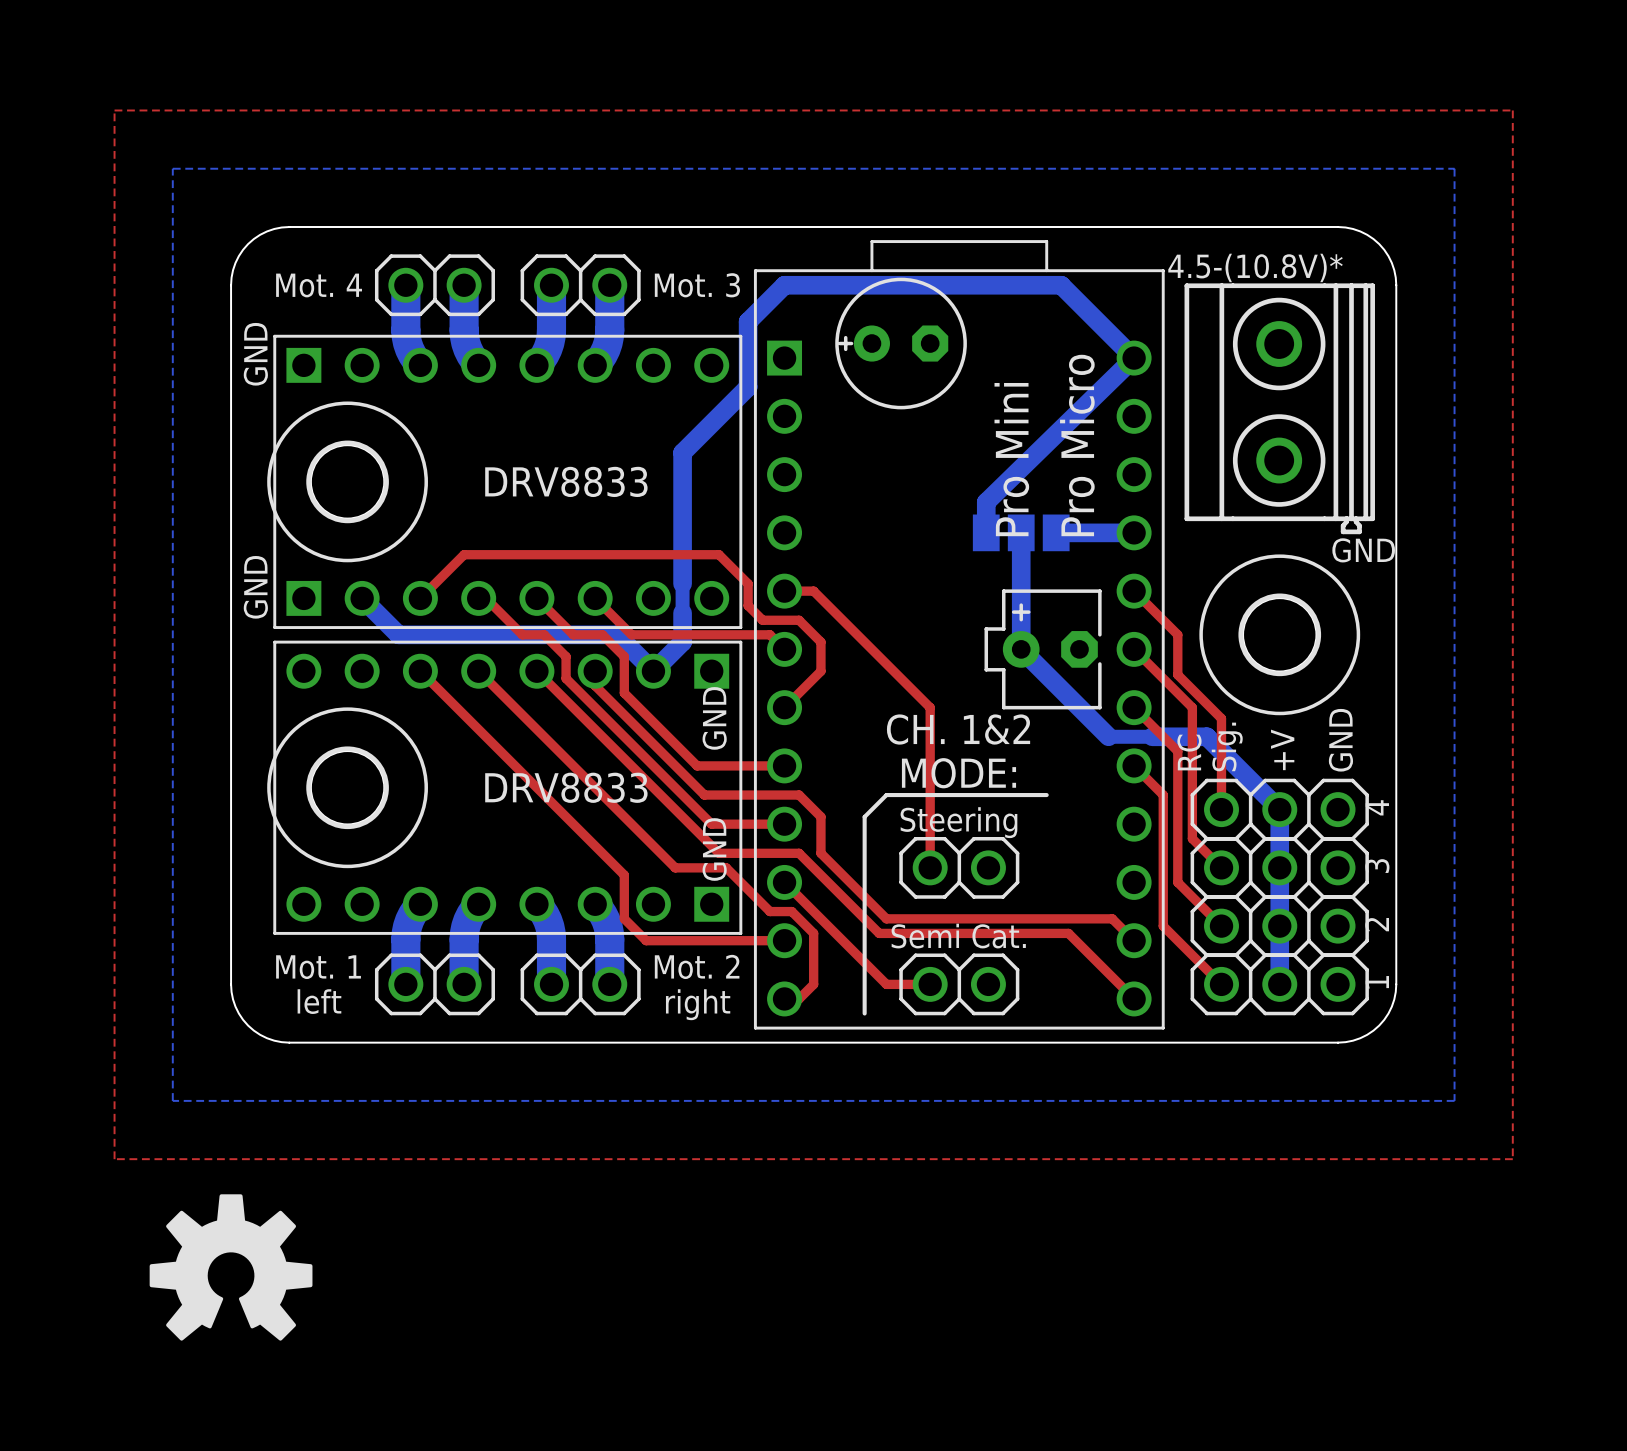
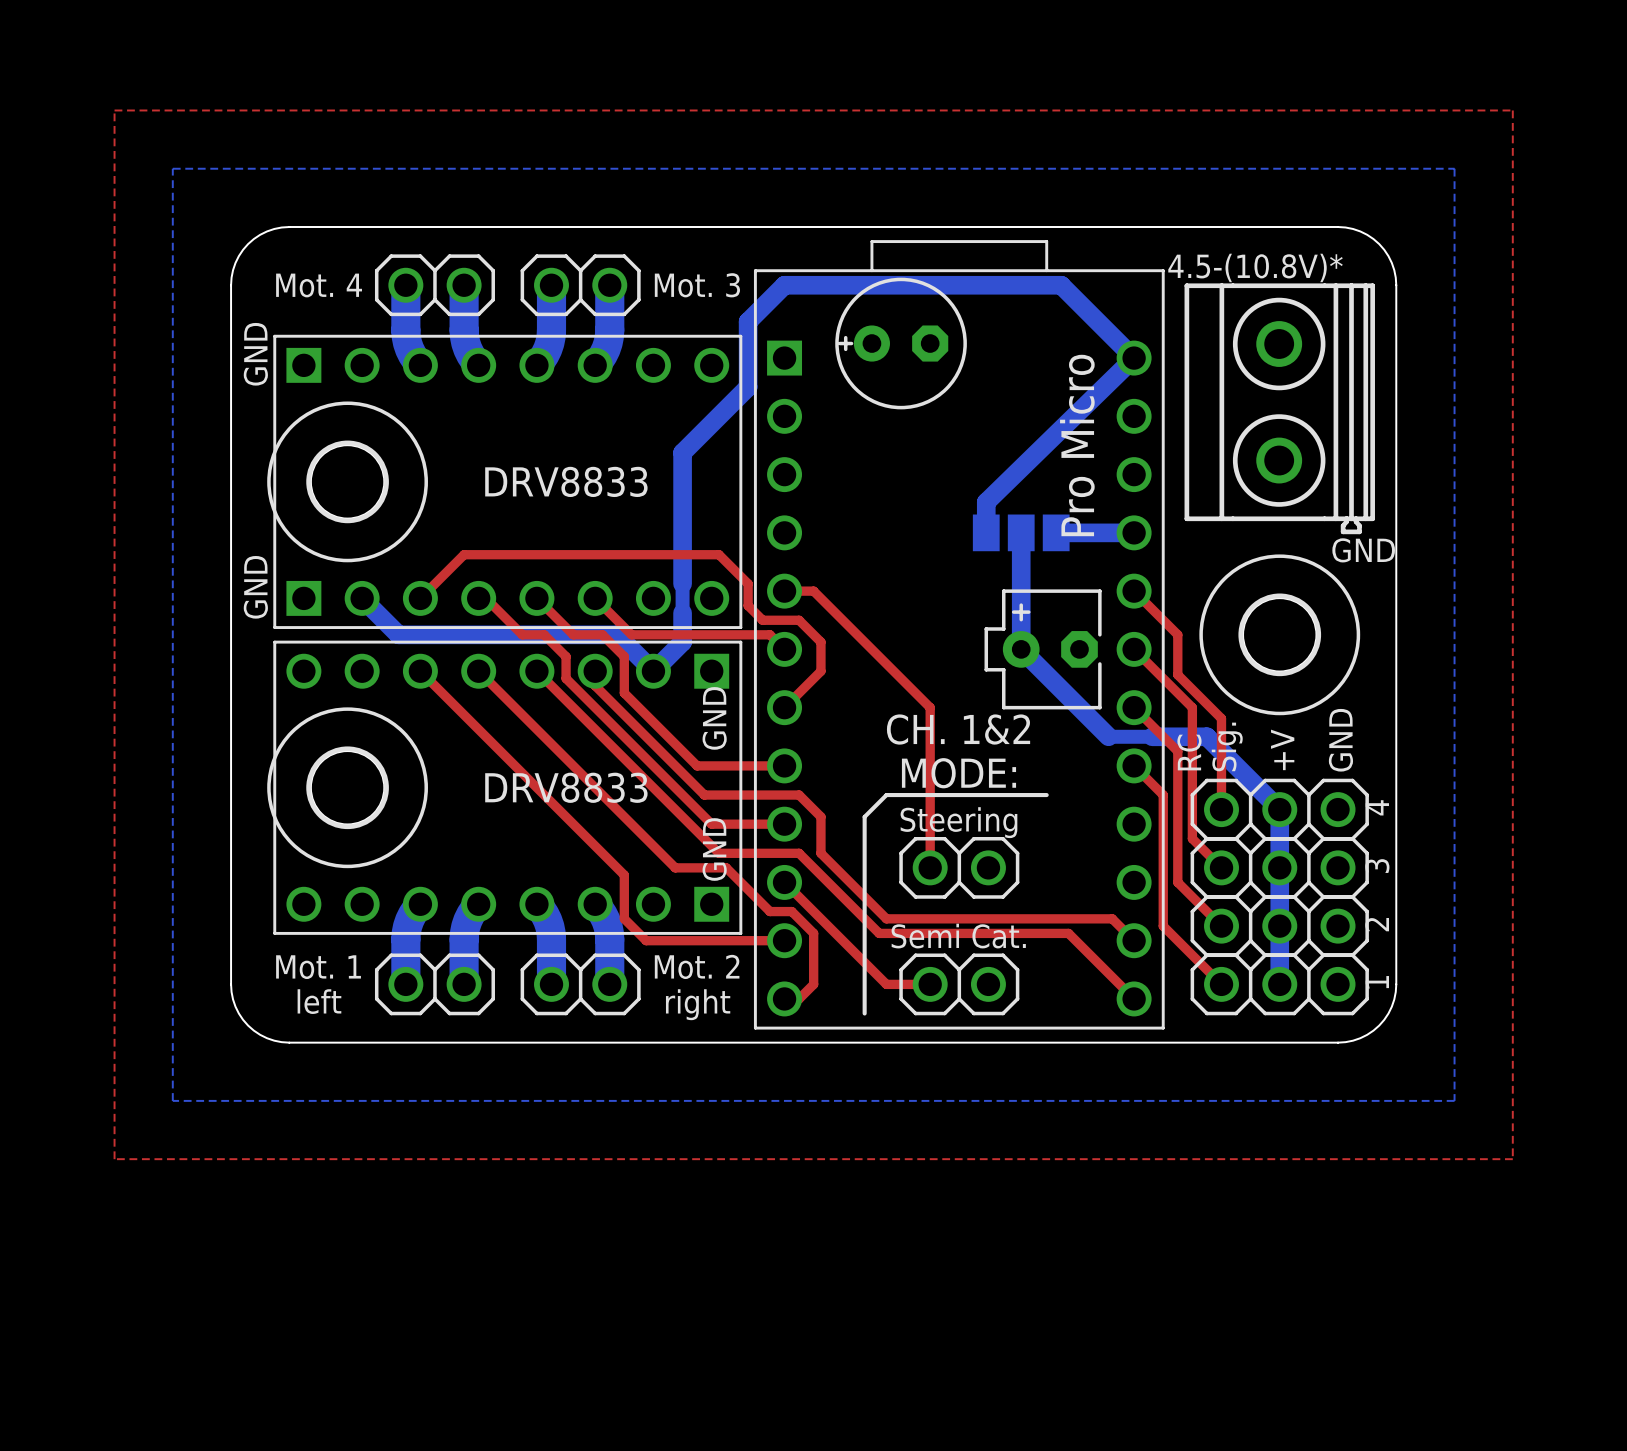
text: Pro Mini (1011, 459) -> none
drawing: [149, 1194, 313, 1341] -> none

